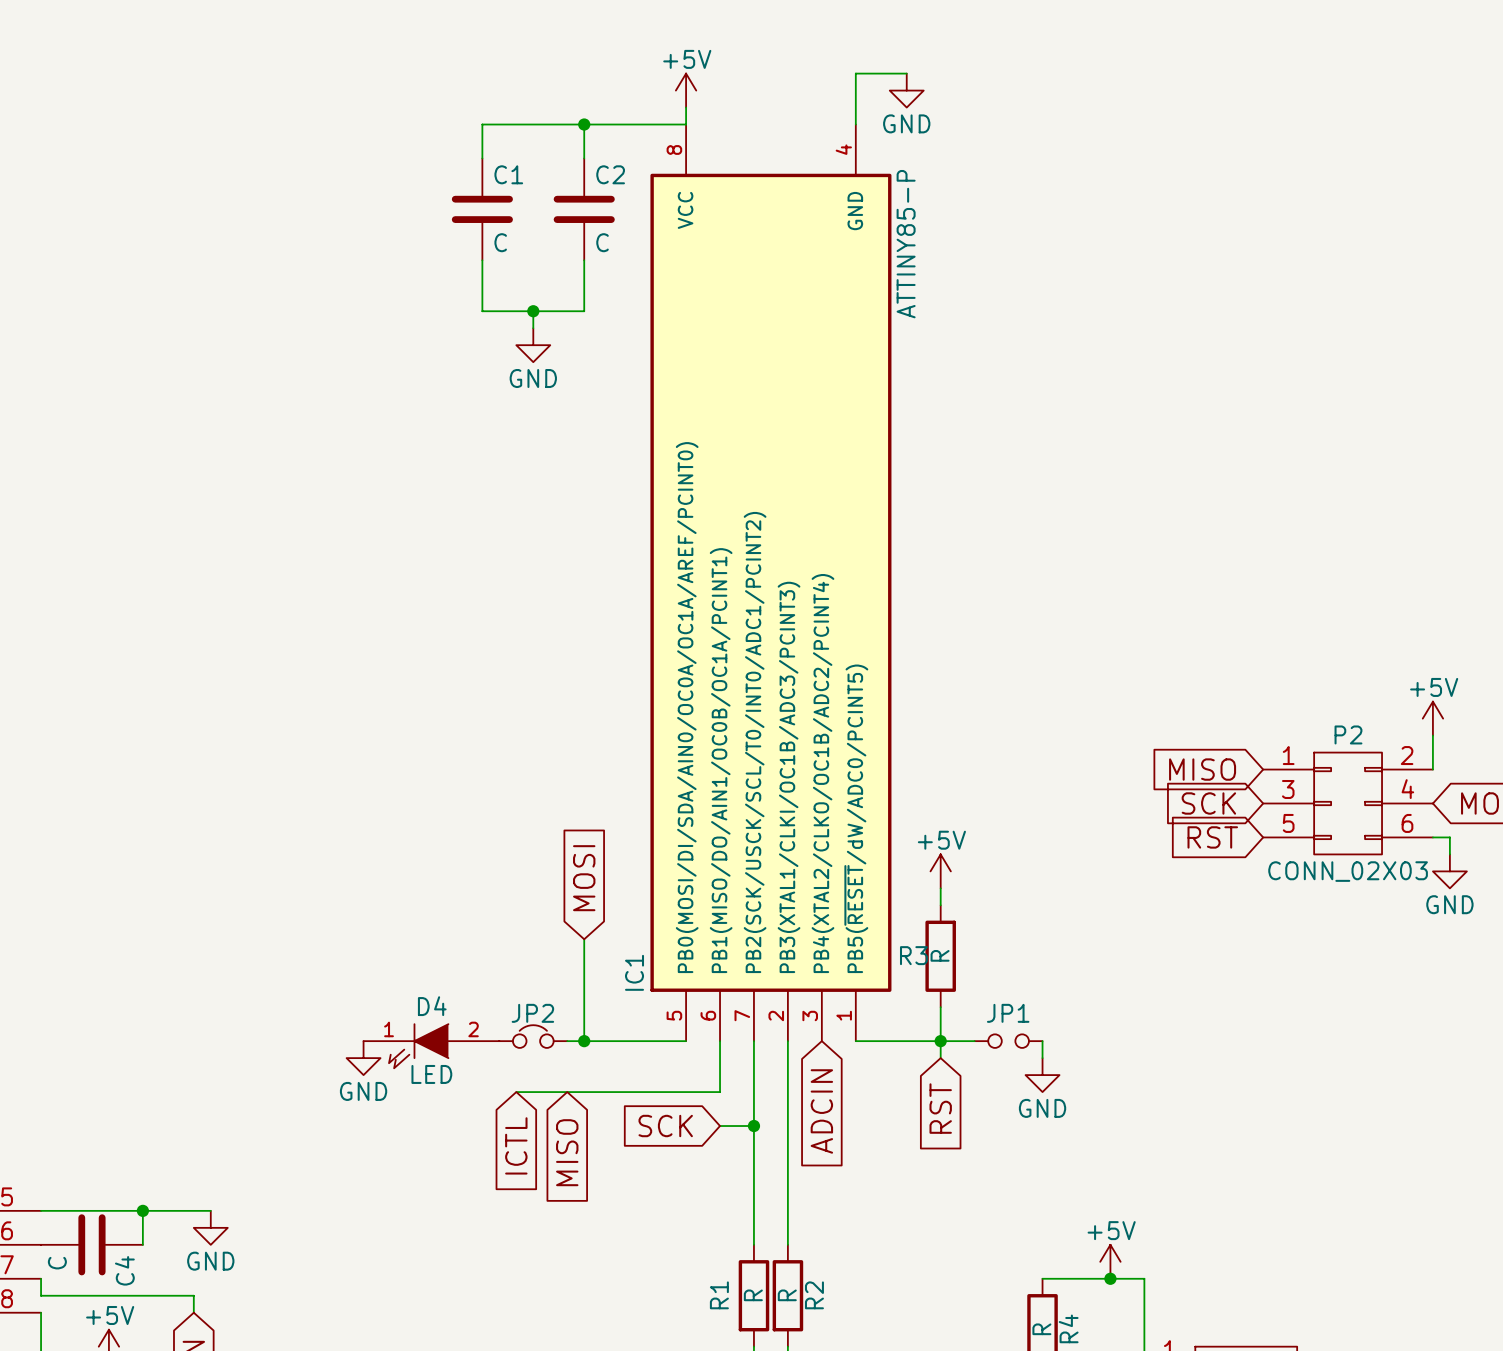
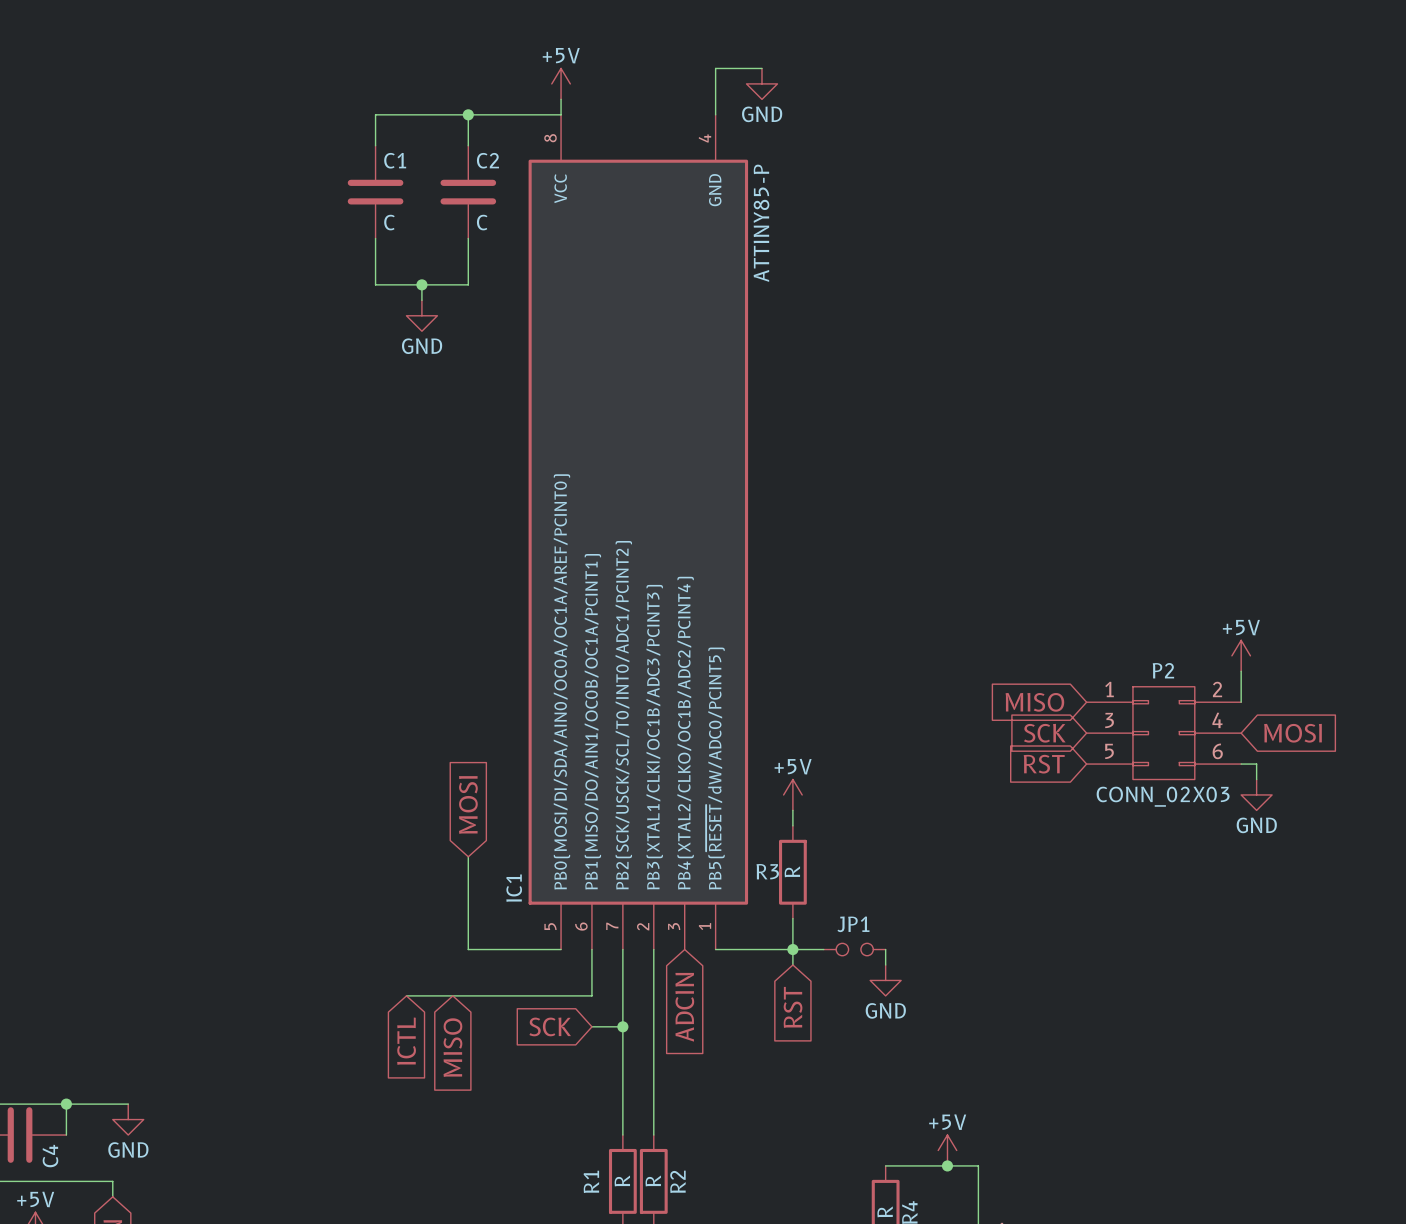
JP2: (533, 1036) -> none
wire: (567, 1041) (584, 1041) -> none
junction: (584, 1041) -> none
D4: LED (431, 1046) -> none
power symbol: GND (363, 1058) -> none

